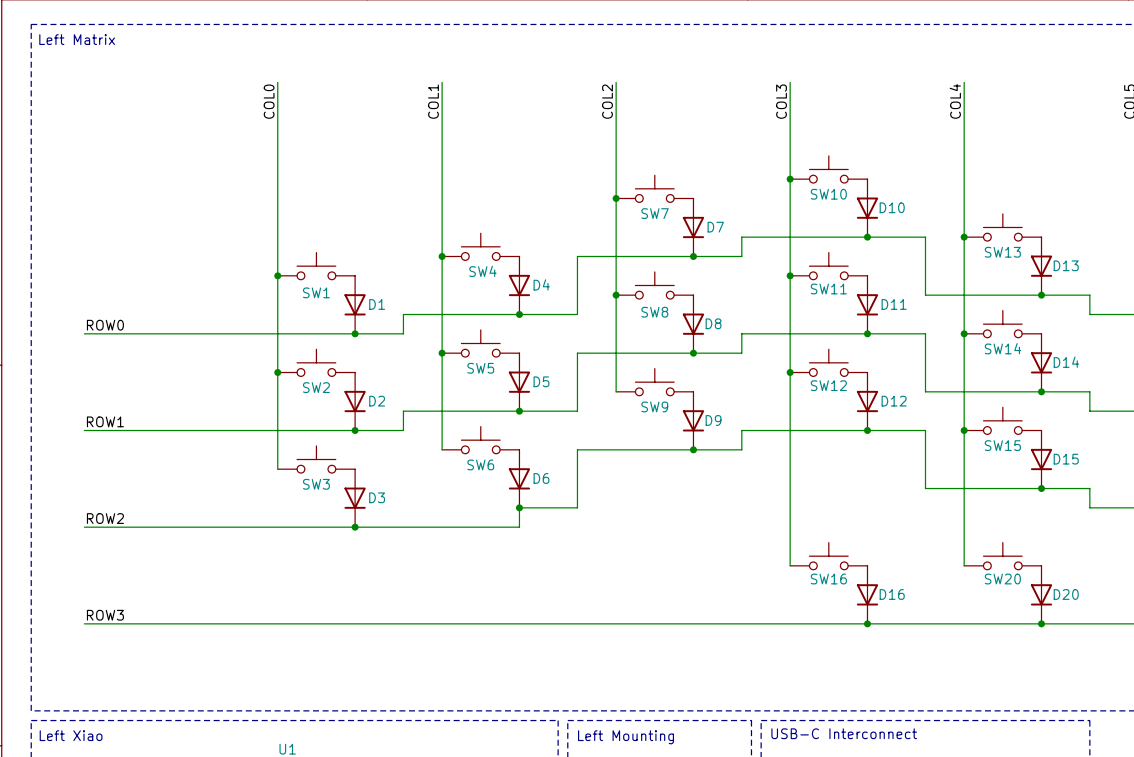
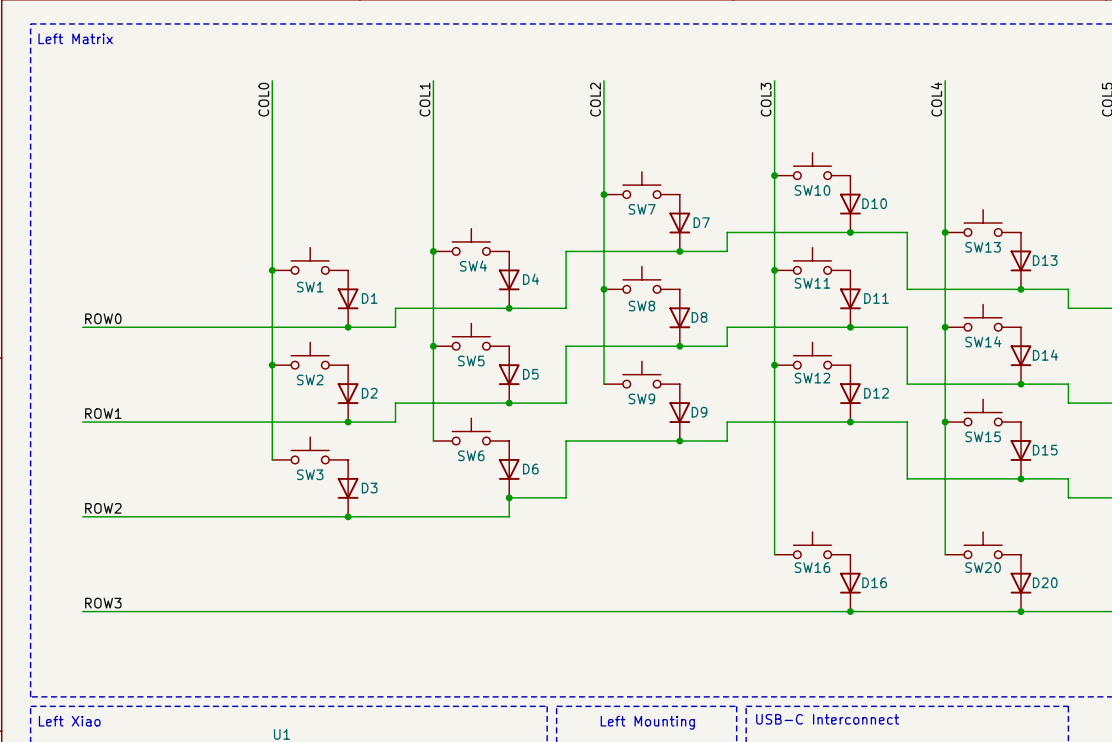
text position: Left Mounting (626, 737) -> Left Mounting (647, 722)

